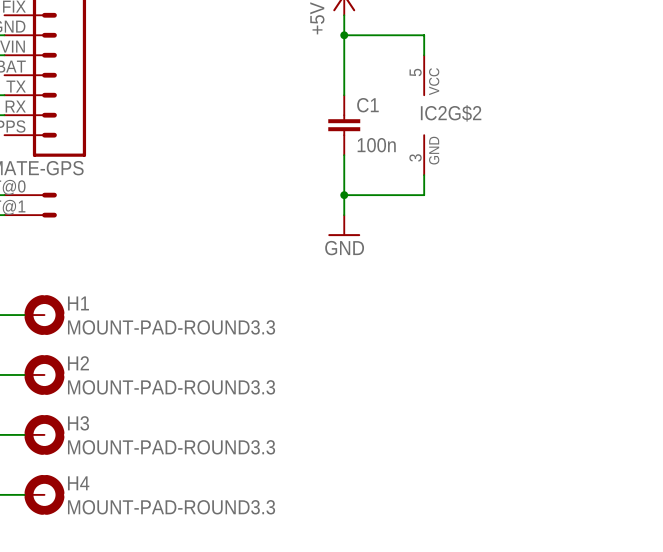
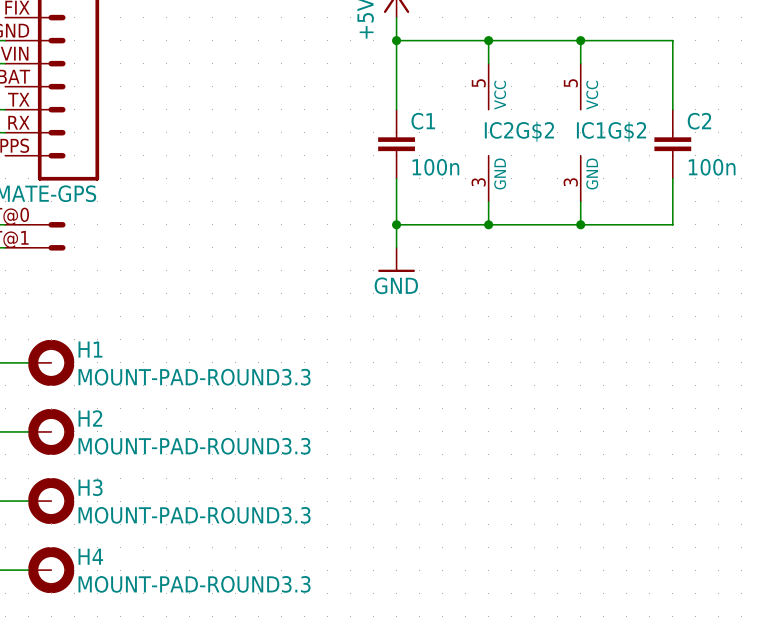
wire: none -> (488, 40) (672, 40) (672, 109)
junction: none -> (488, 40)
wire: none -> (580, 40) (580, 63)
junction: none -> (580, 40)
IC1G$2: none -> (580, 132)
C2: none -> 100n (672, 144)
wire: none -> (672, 178) (672, 224) (488, 224)
wire: none -> (580, 201) (580, 224)
junction: none -> (488, 224)
junction: none -> (580, 224)

